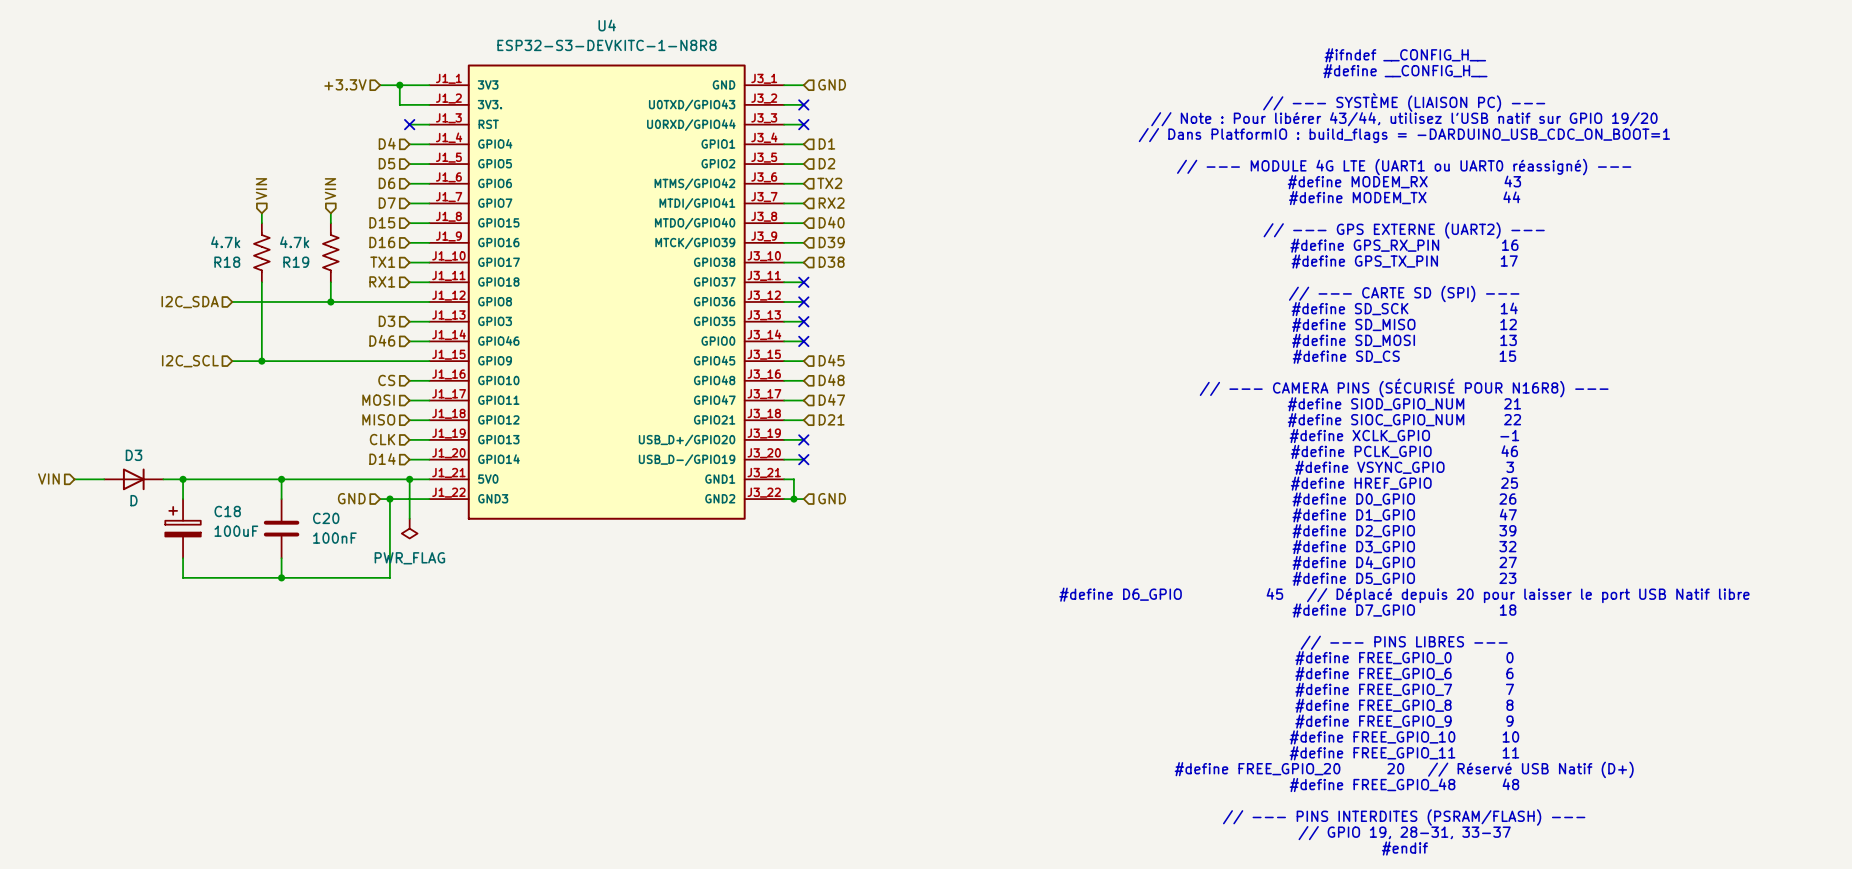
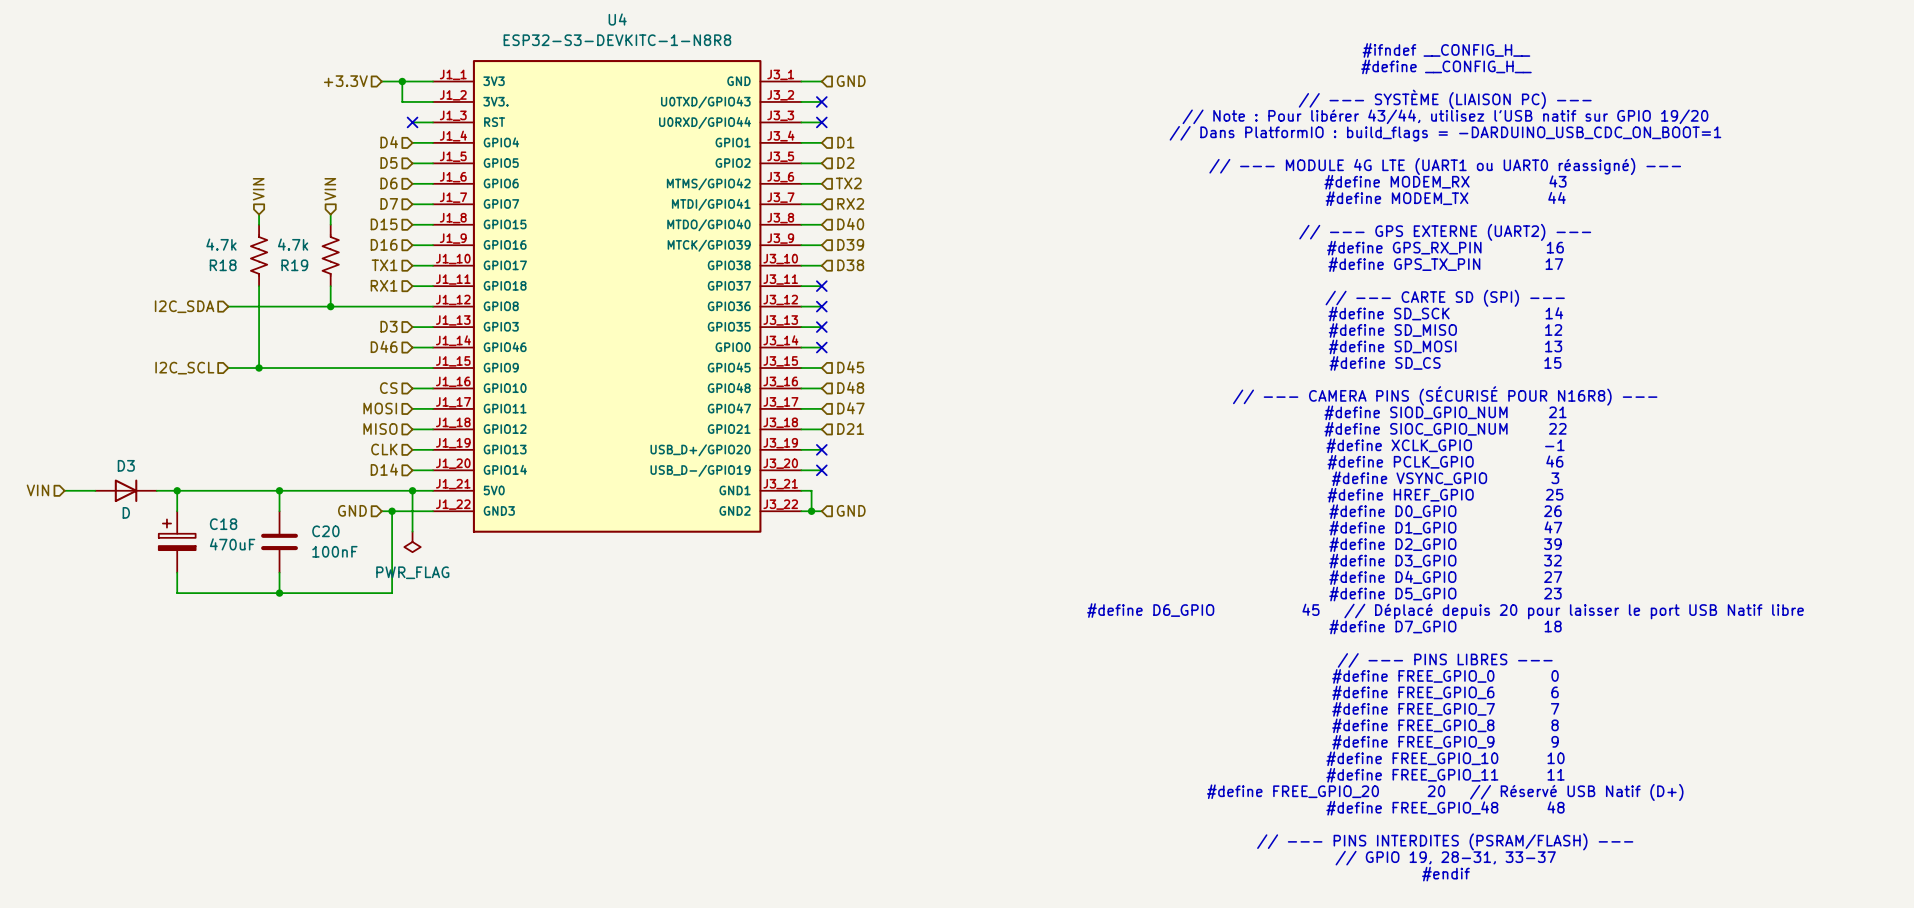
C18 value: 100uF (236, 531) -> 470uF (232, 544)

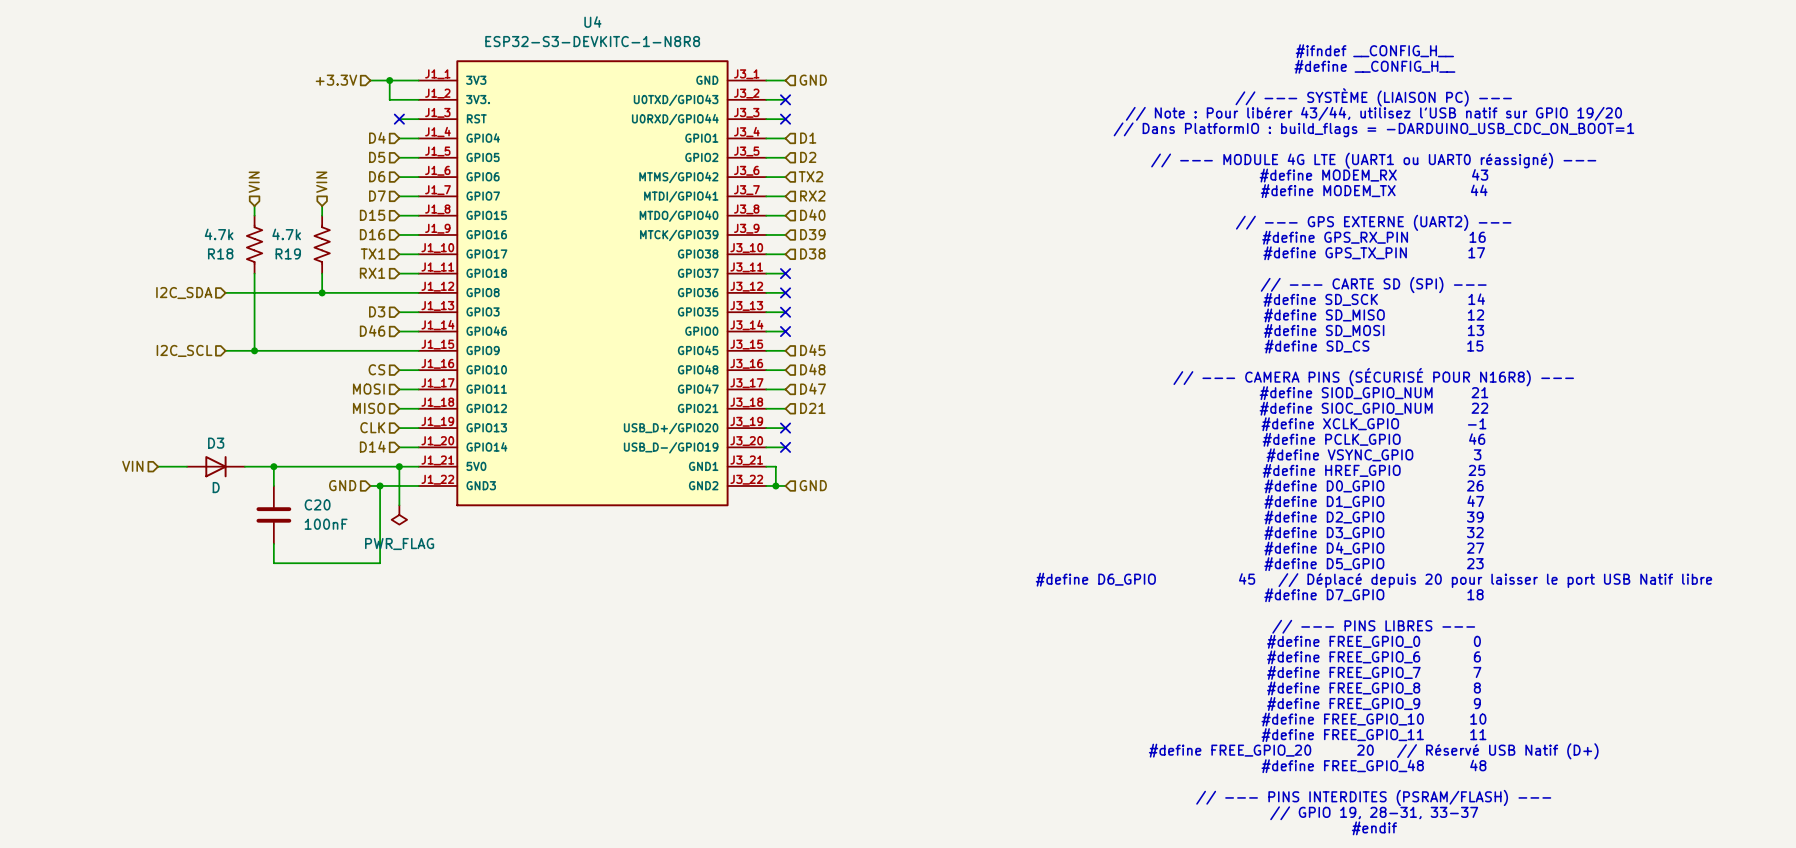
hierarchical label position: VIN (37, 490) -> VIN (132, 466)
wire: (64, 490) (95, 490) -> none
D3 position: (126, 490) -> (215, 466)
wire: (177, 490) (177, 511) -> none
junction: (177, 490) -> none
C18: 470uF (177, 541) -> none
wire: (177, 572) (177, 593) (279, 593) -> none
junction: (279, 593) -> none

